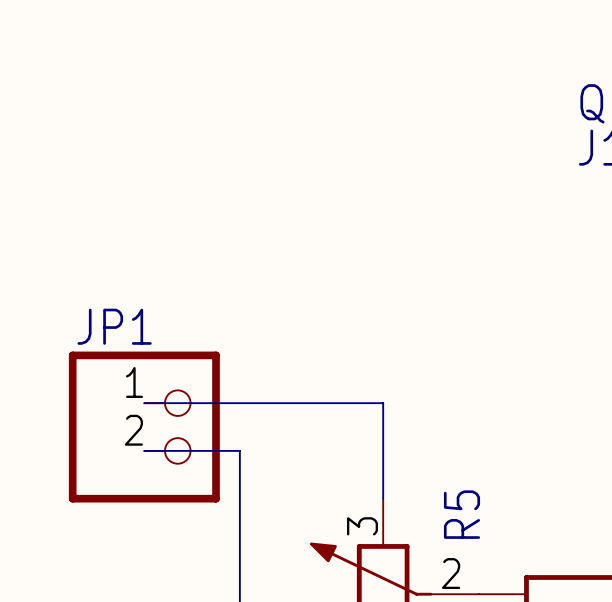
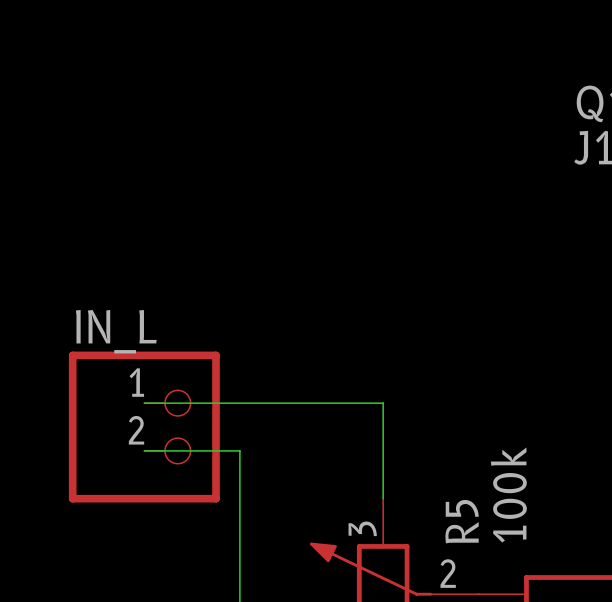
JP1 name: JP1 (114, 326) -> IN_L (116, 331)
R5 value: none -> 100k (508, 495)

